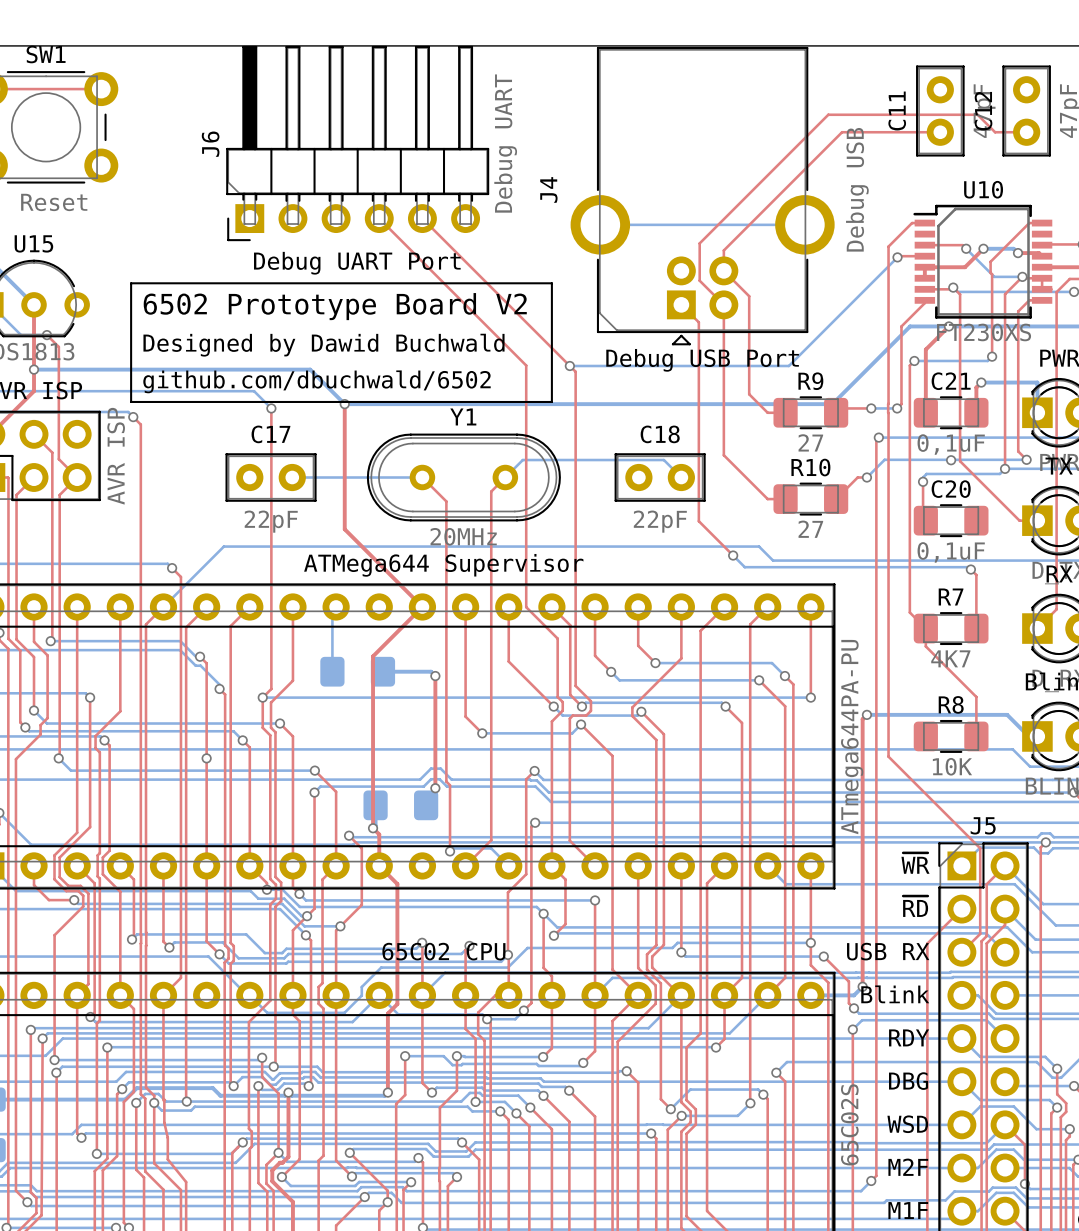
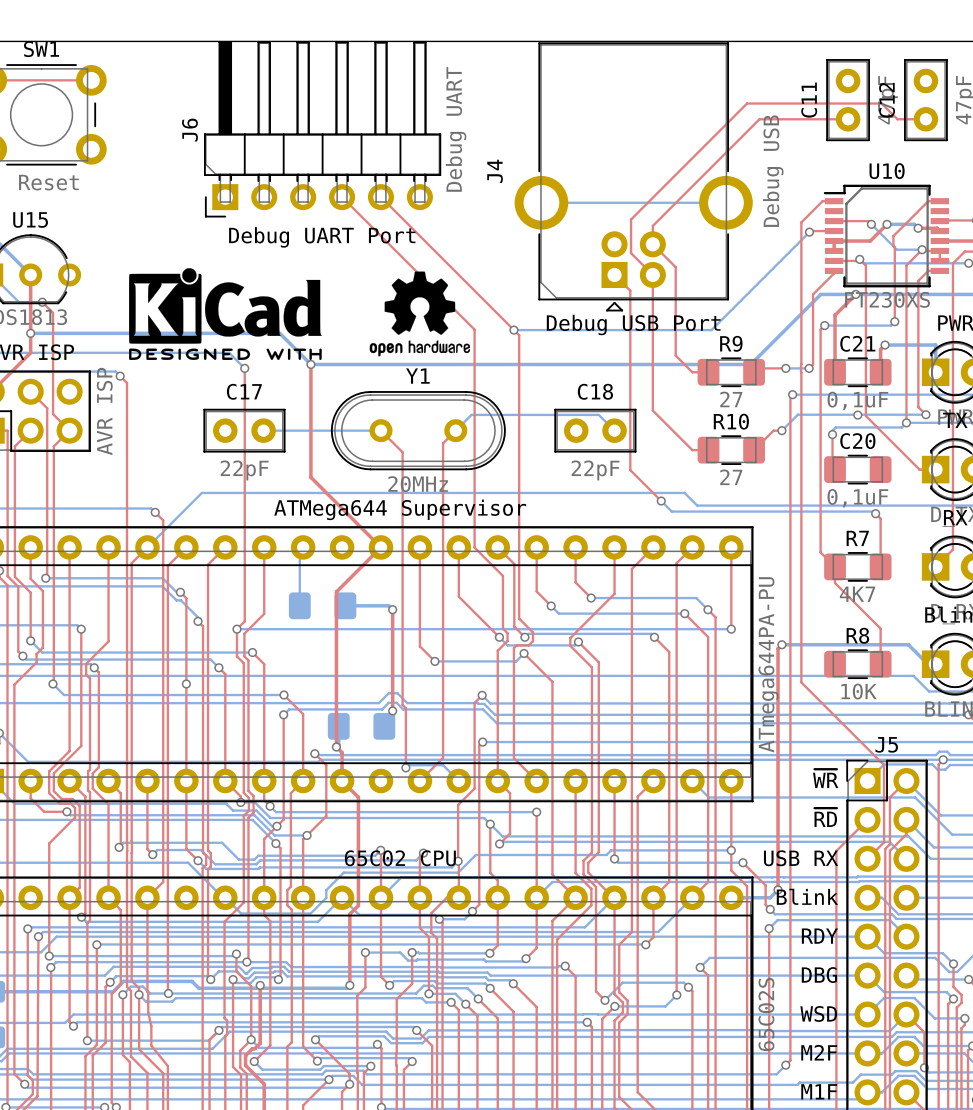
line: (131, 283) (131, 401) (551, 401) (551, 283) (131, 283) -> none
drawing: none -> [129, 268, 322, 360]
drawing: none -> [369, 271, 471, 357]
text: 6502 Prototype Board V2 (335, 306) -> none
text: Designed by Dawid Buchwald (324, 345) -> none
text: github.com/dbuchwald/6502 (317, 381) -> none

